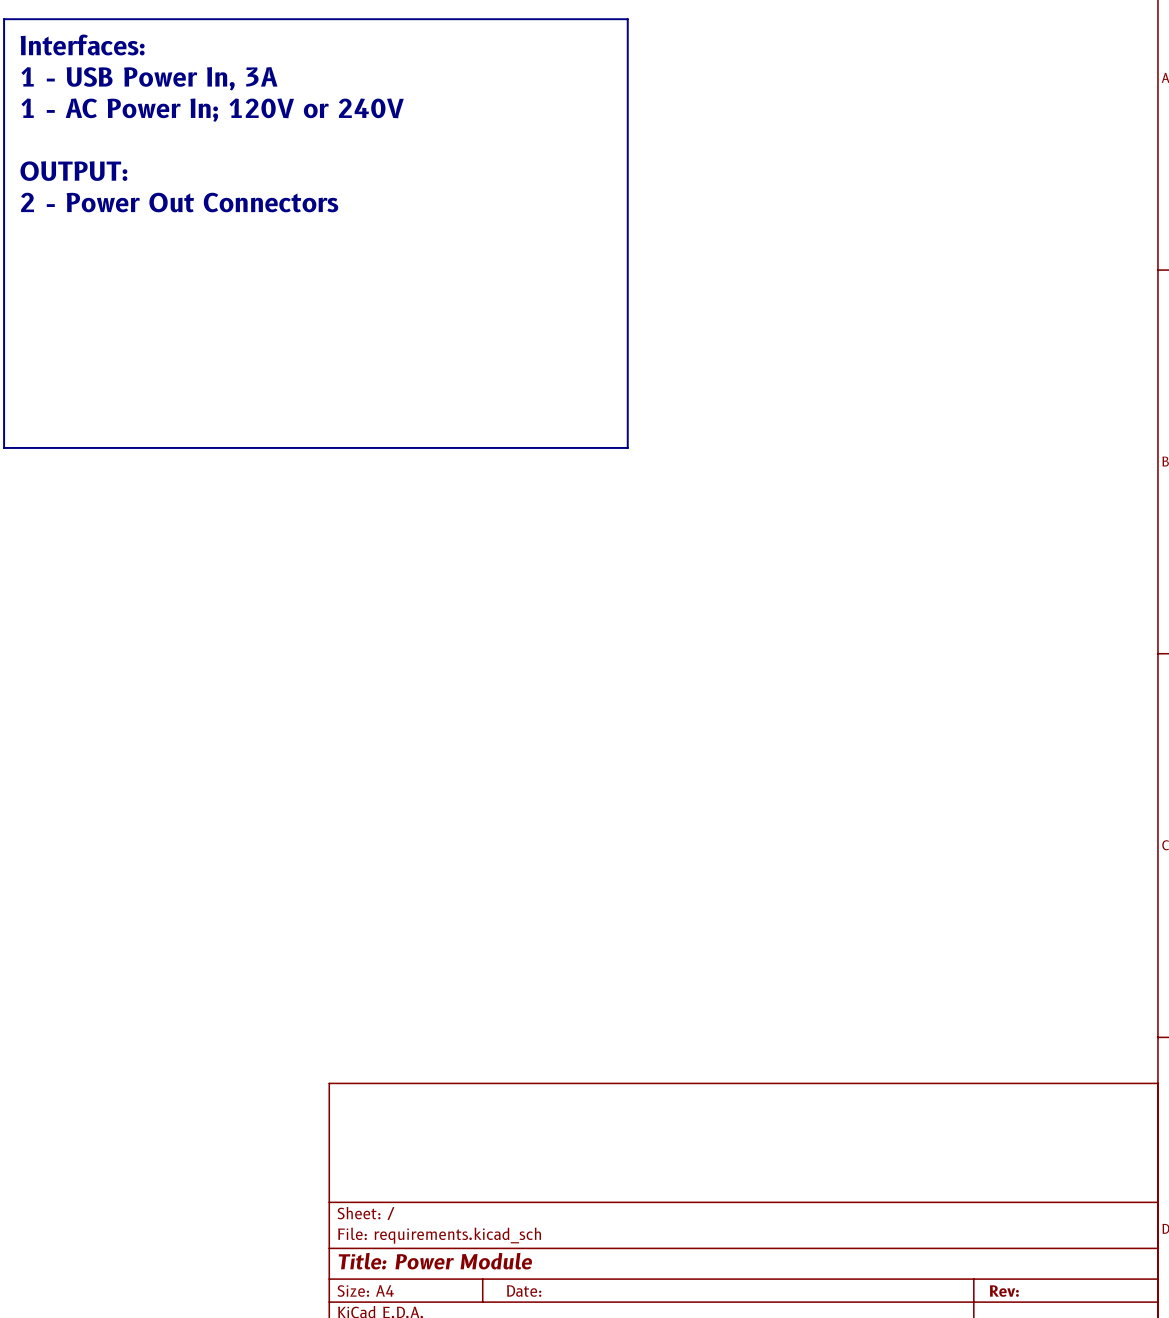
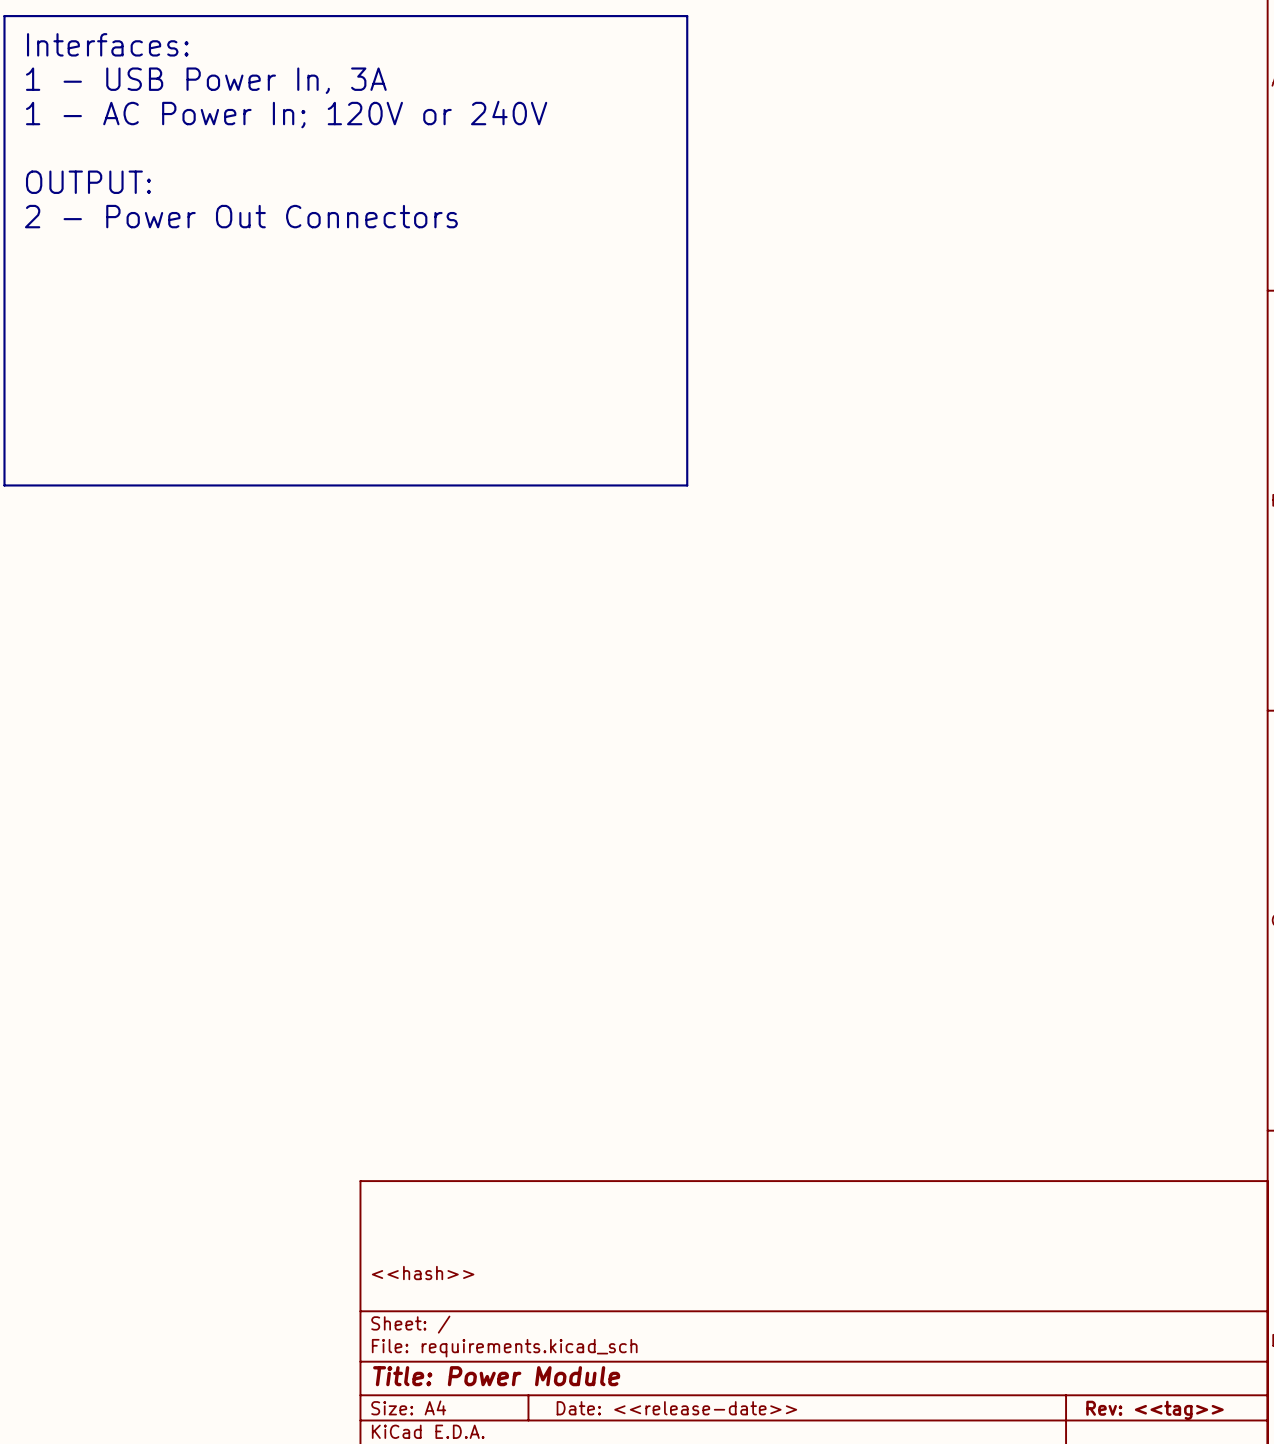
title block: none -> <<hash>> (423, 1273)
title block: Date: (524, 1291) -> Date: <<release-date>> (676, 1408)
title block: Rev: (1004, 1291) -> Rev: <<tag>> (1155, 1410)

